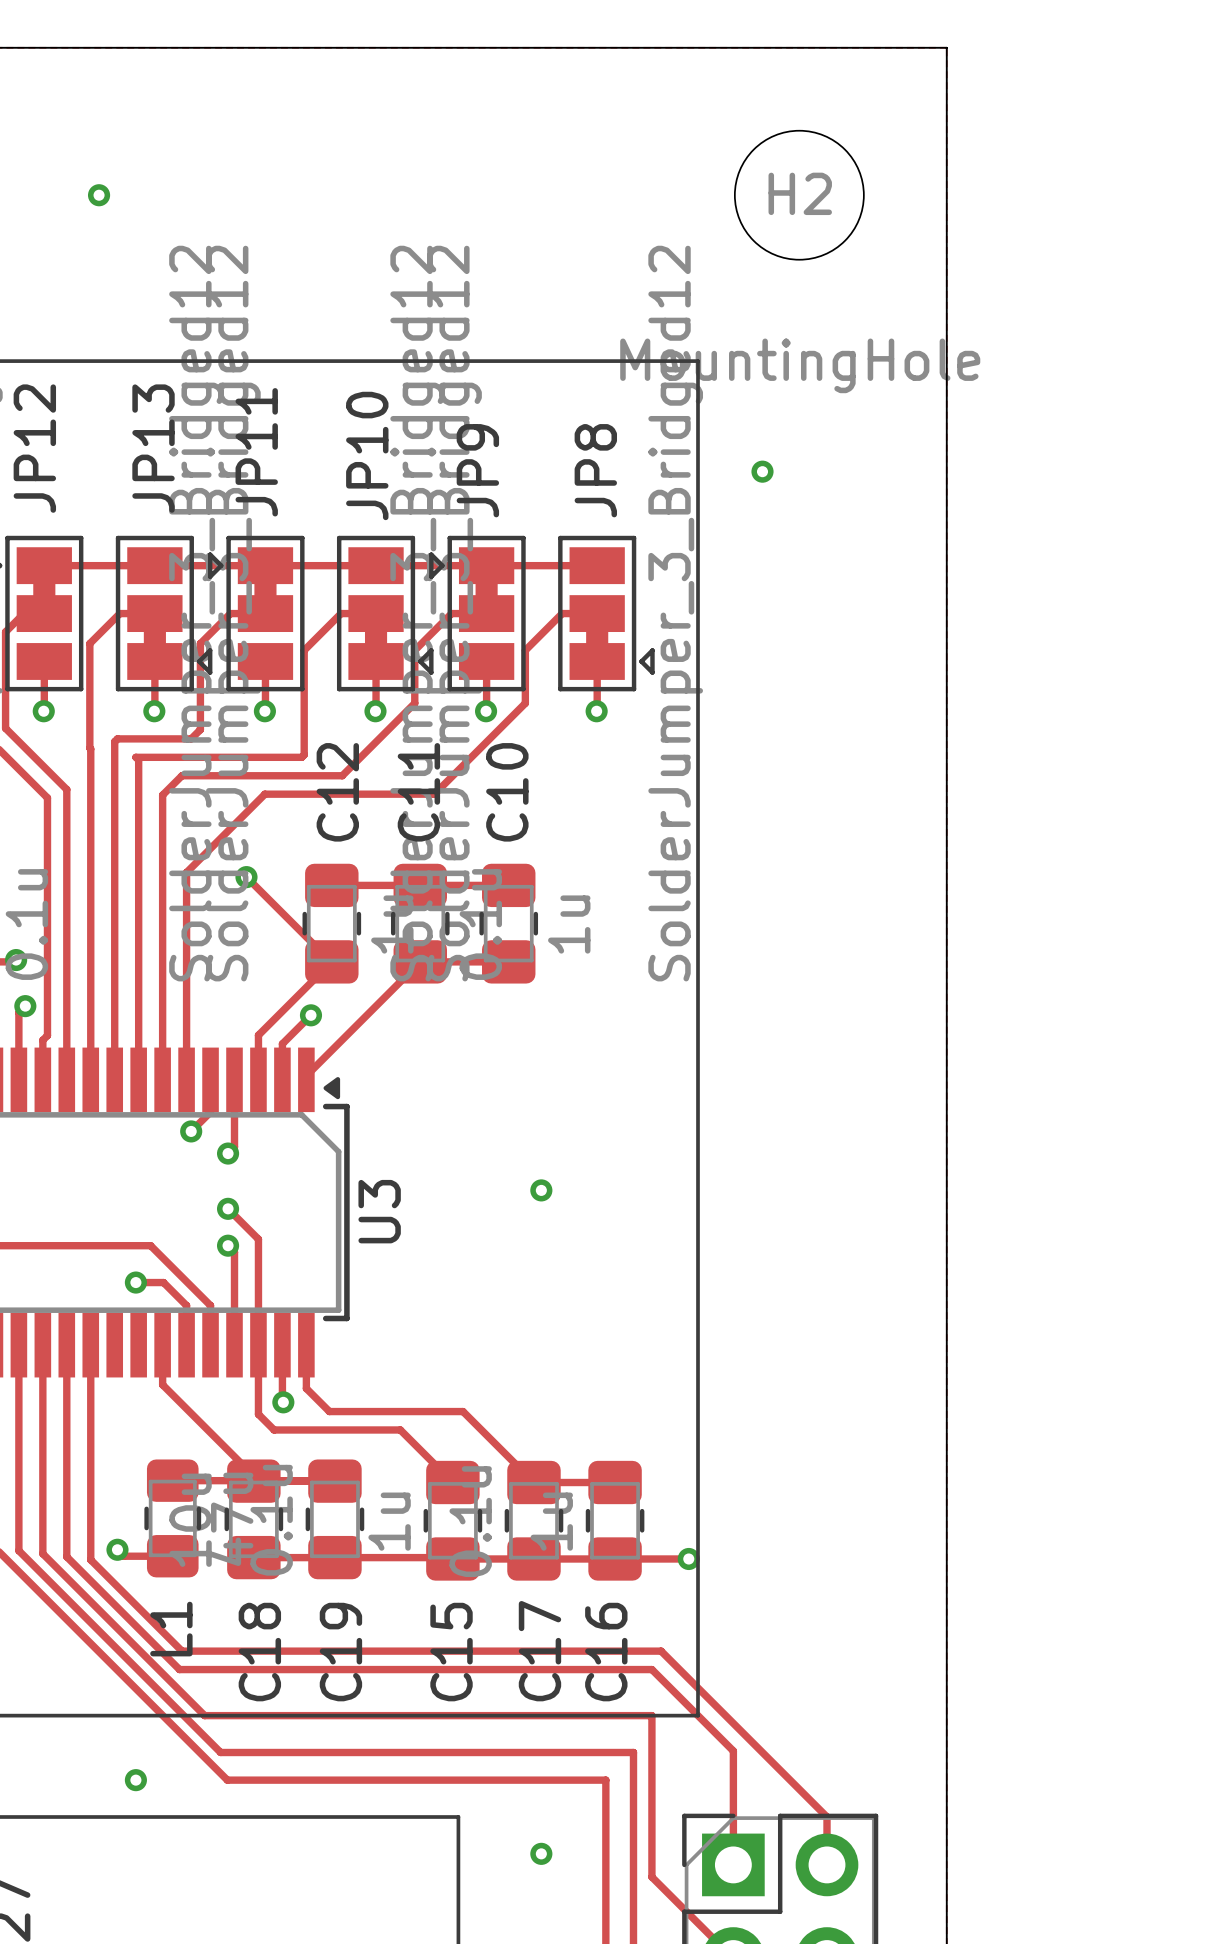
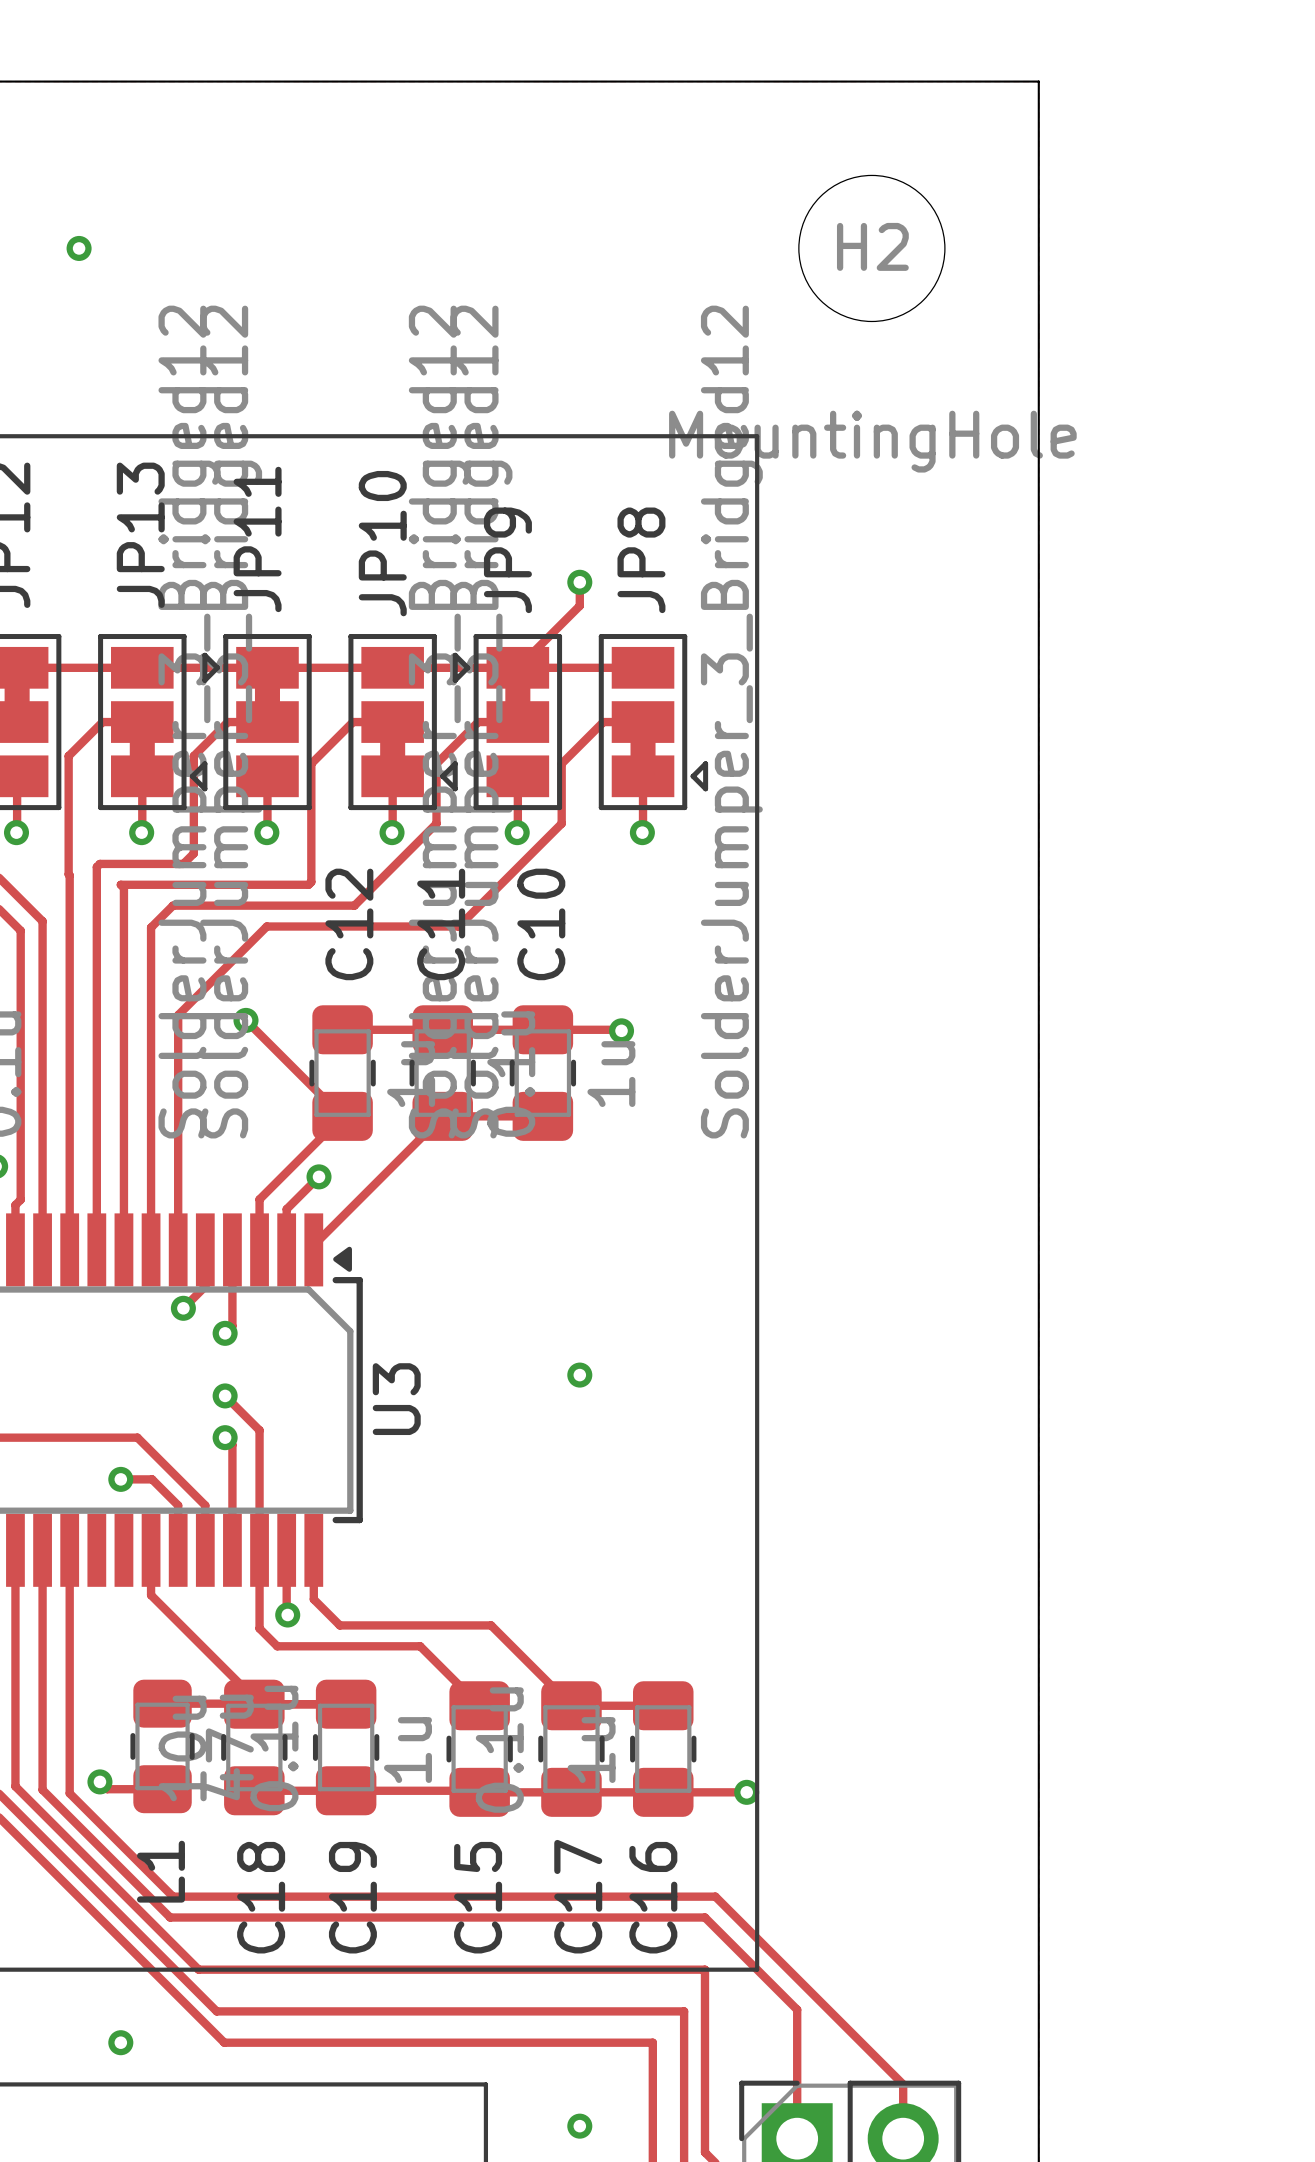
via: (762, 471) -> none
track: none -> (579, 582) (579, 605) (517, 667)
via: none -> (579, 582)
track: none -> (542, 1029) (621, 1030)
via: none -> (621, 1030)

